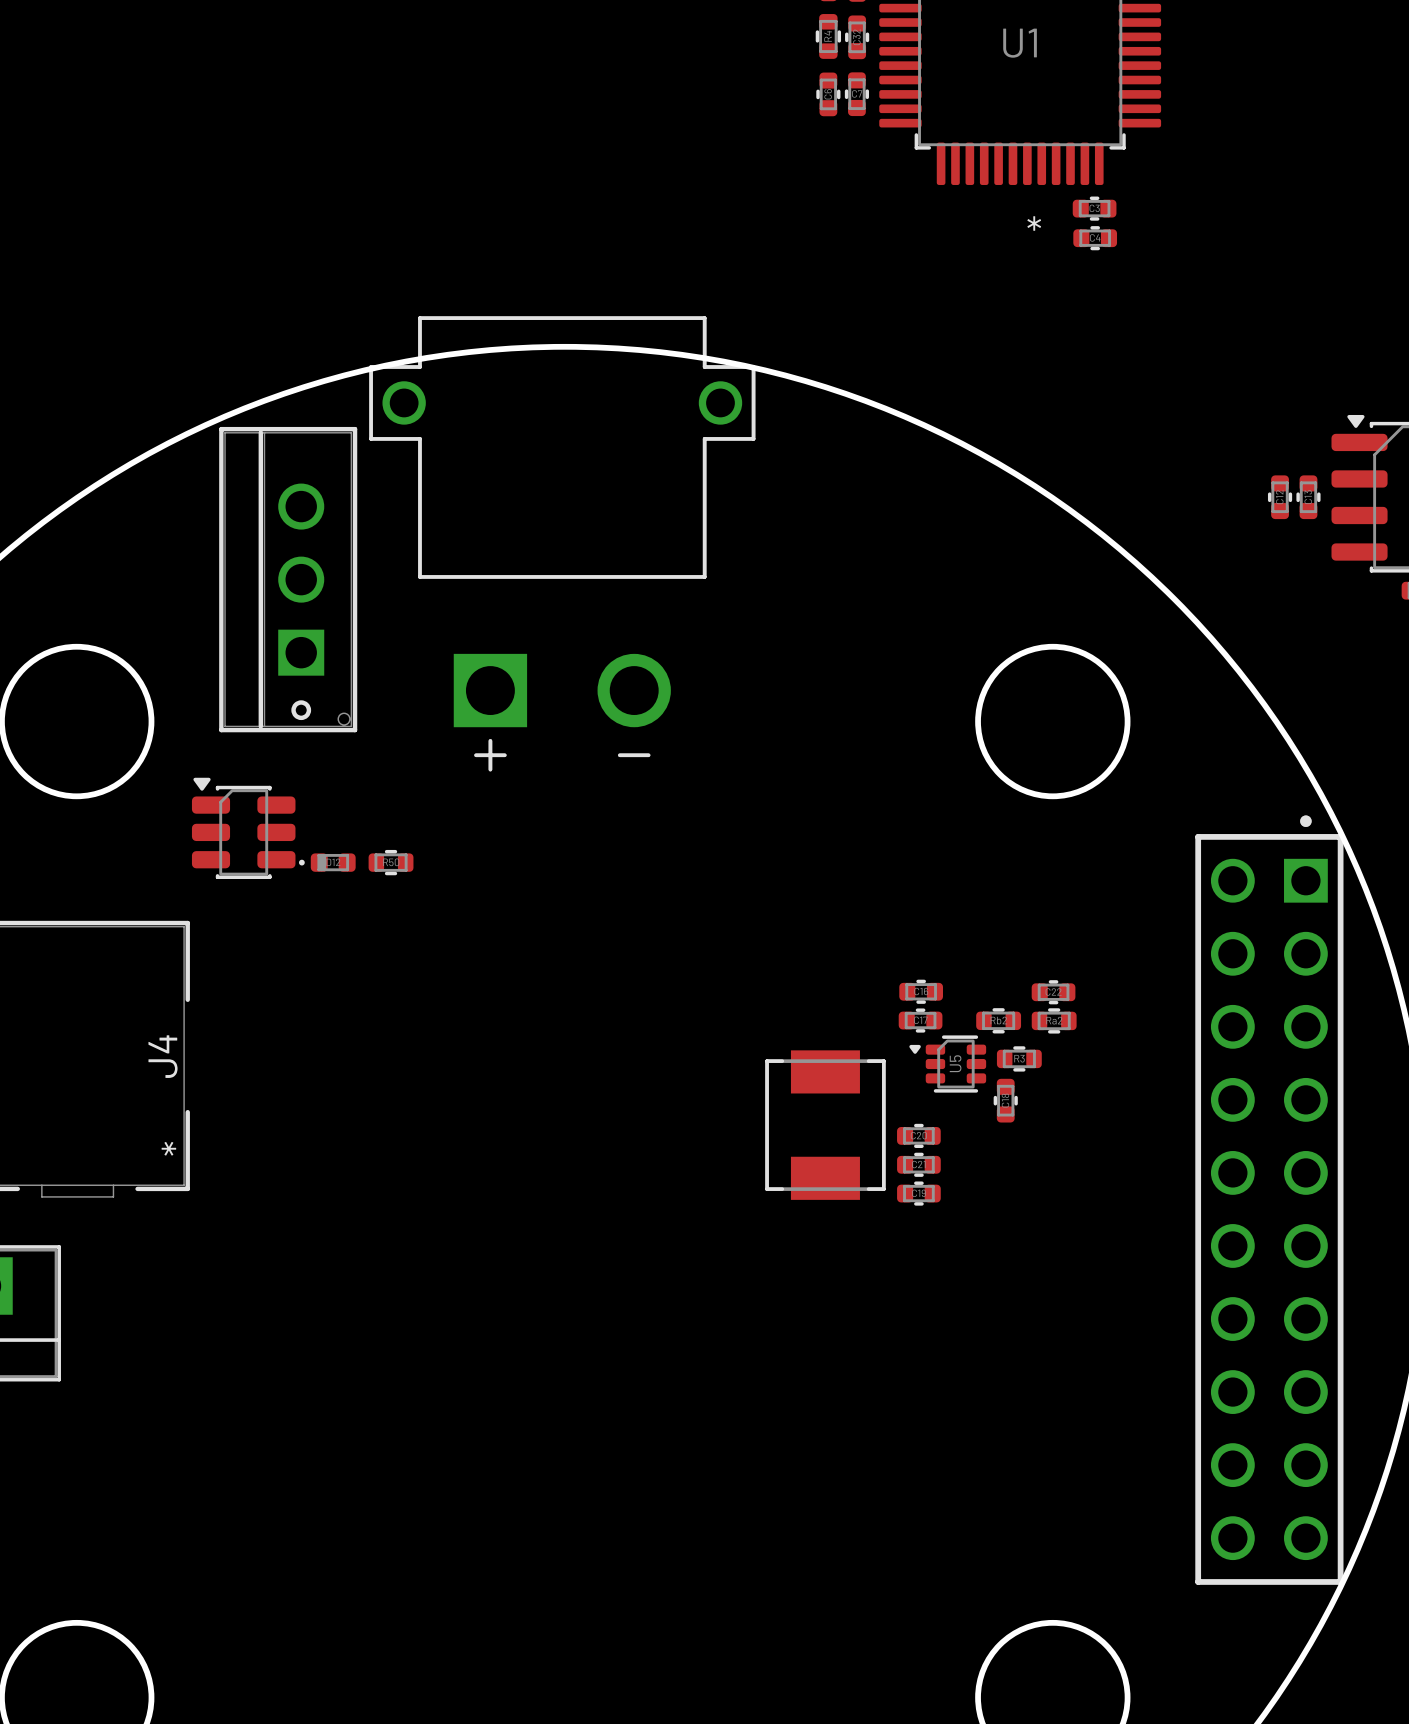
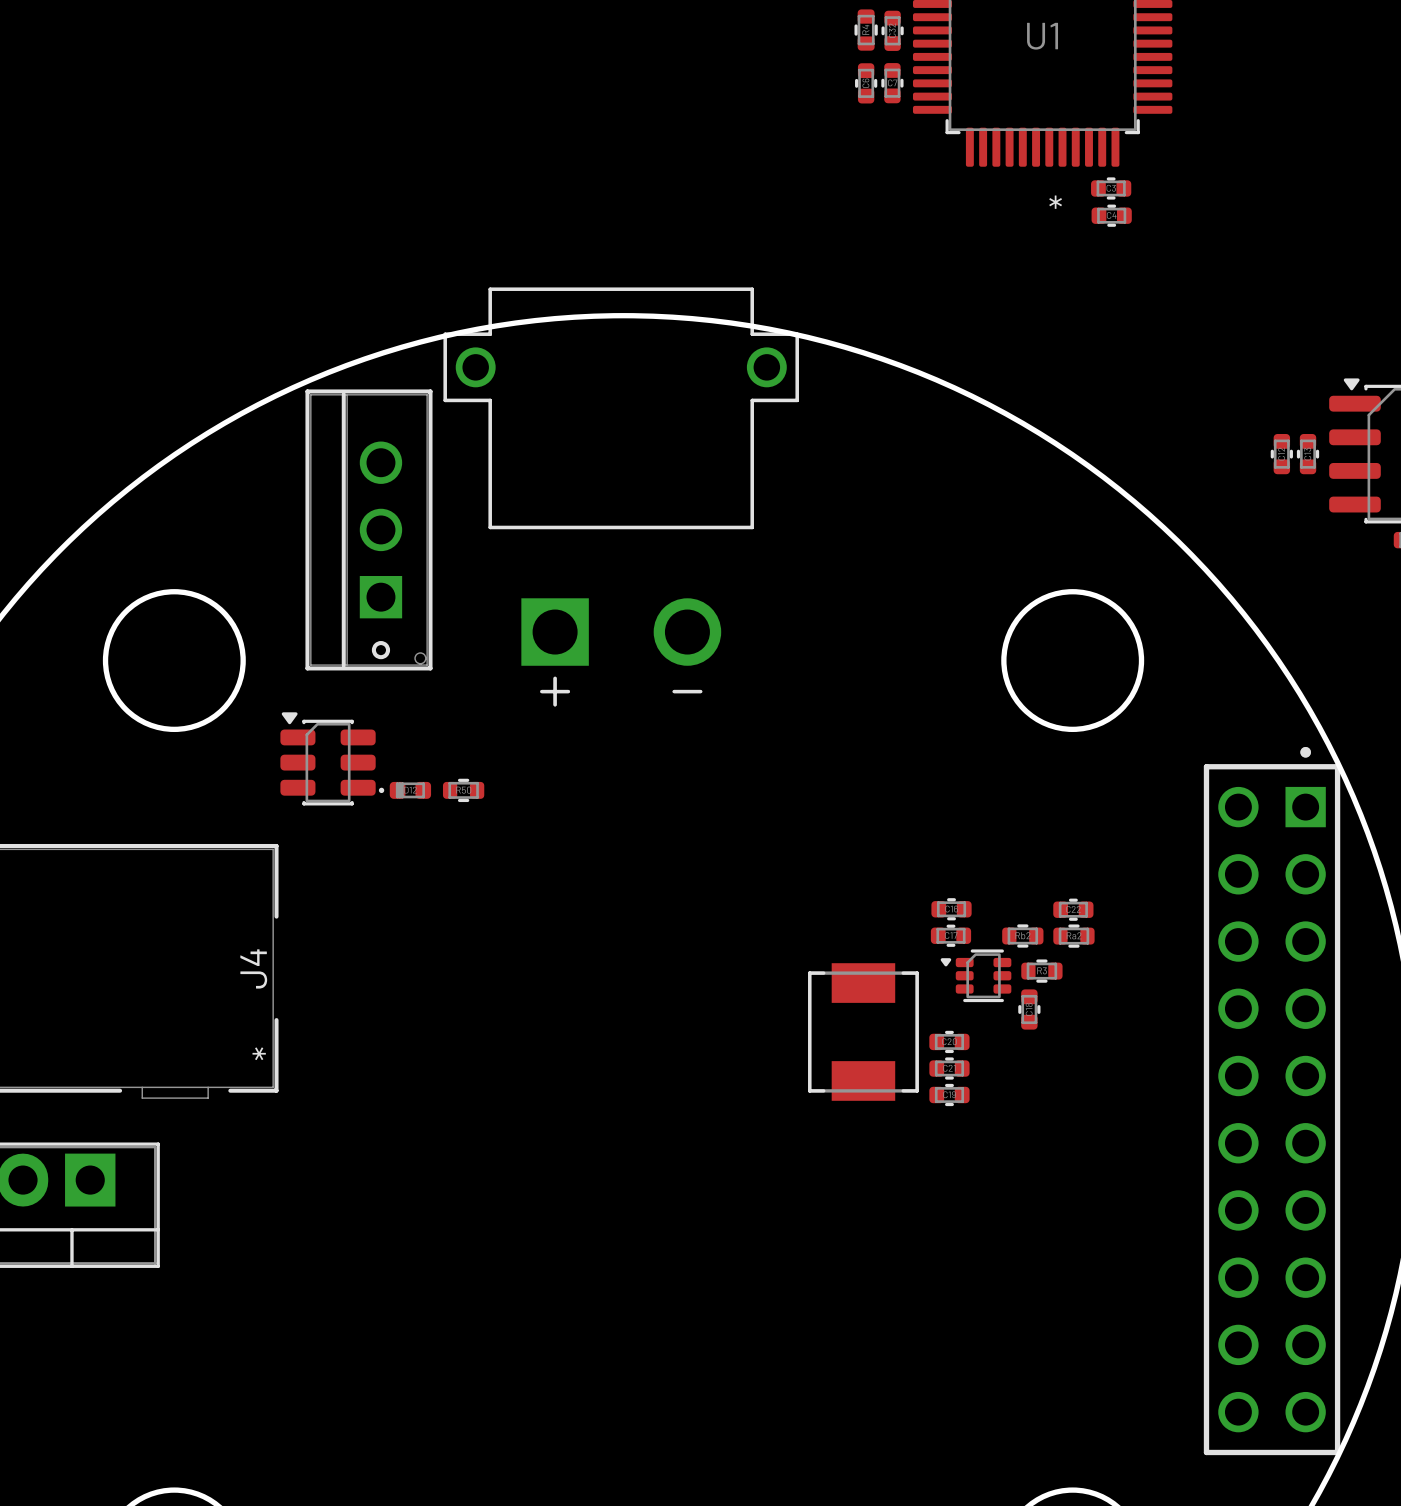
U5 name: U5 (955, 1063) -> none

